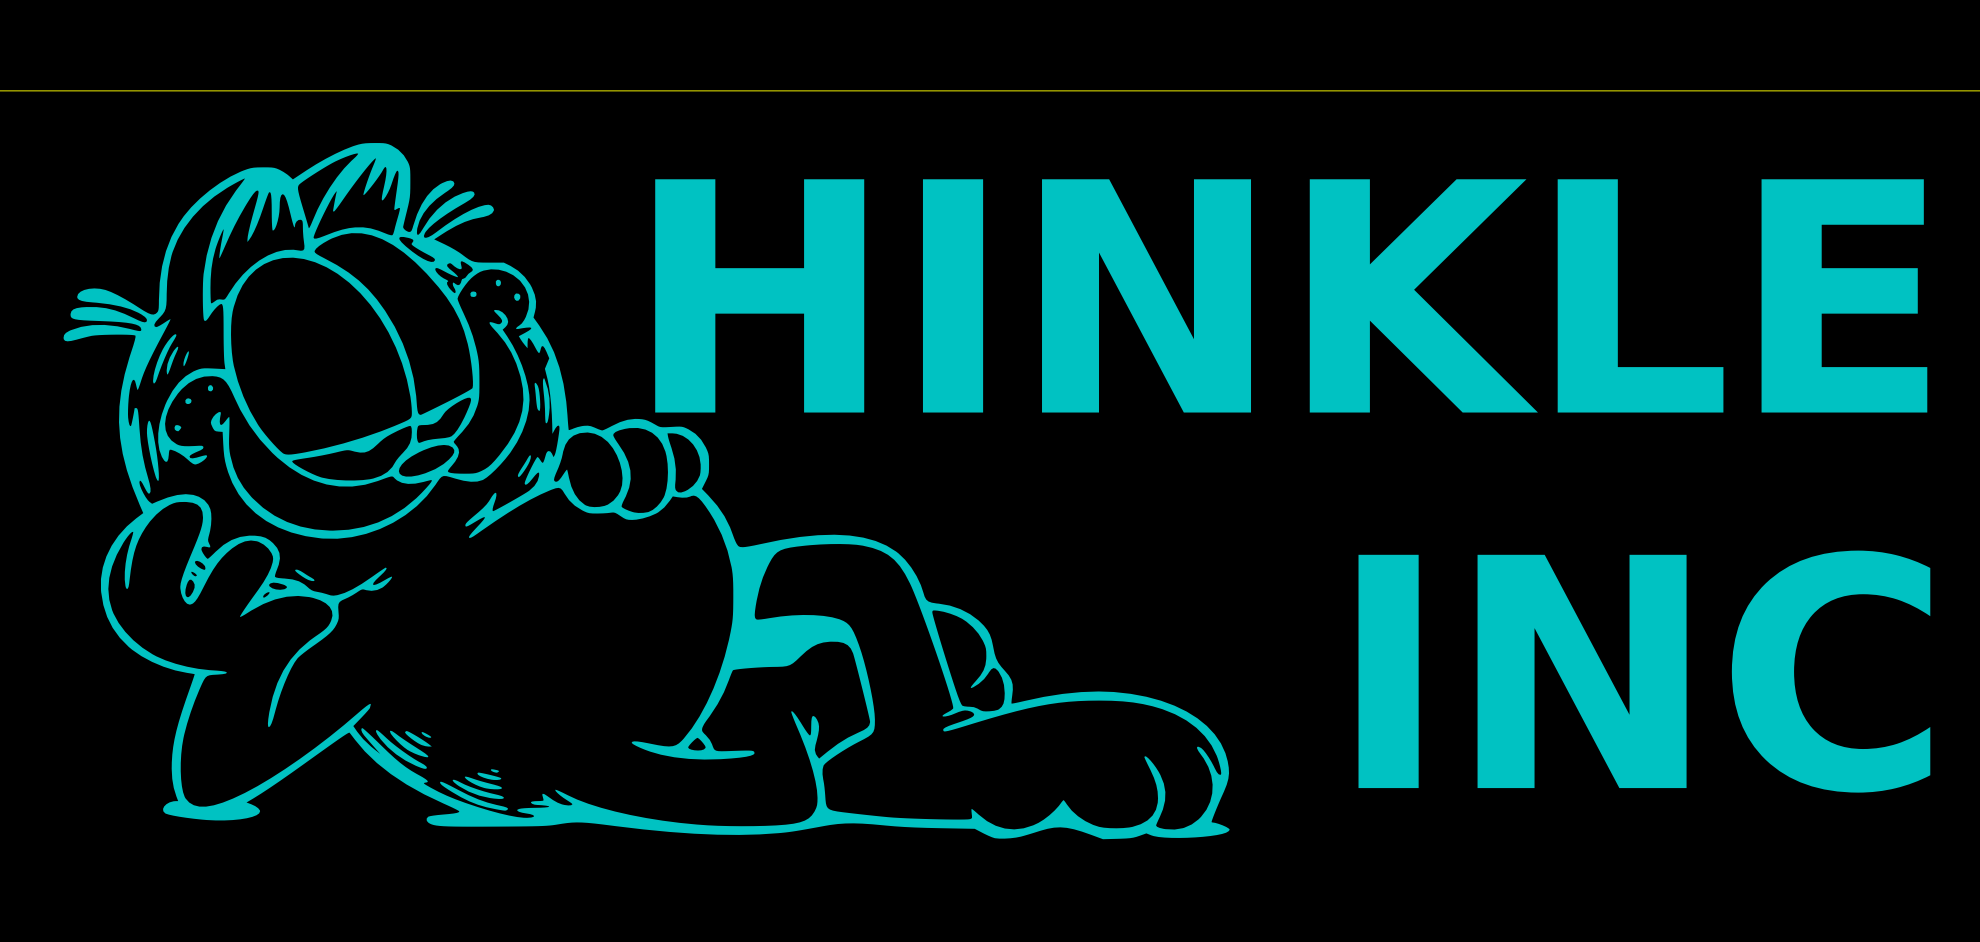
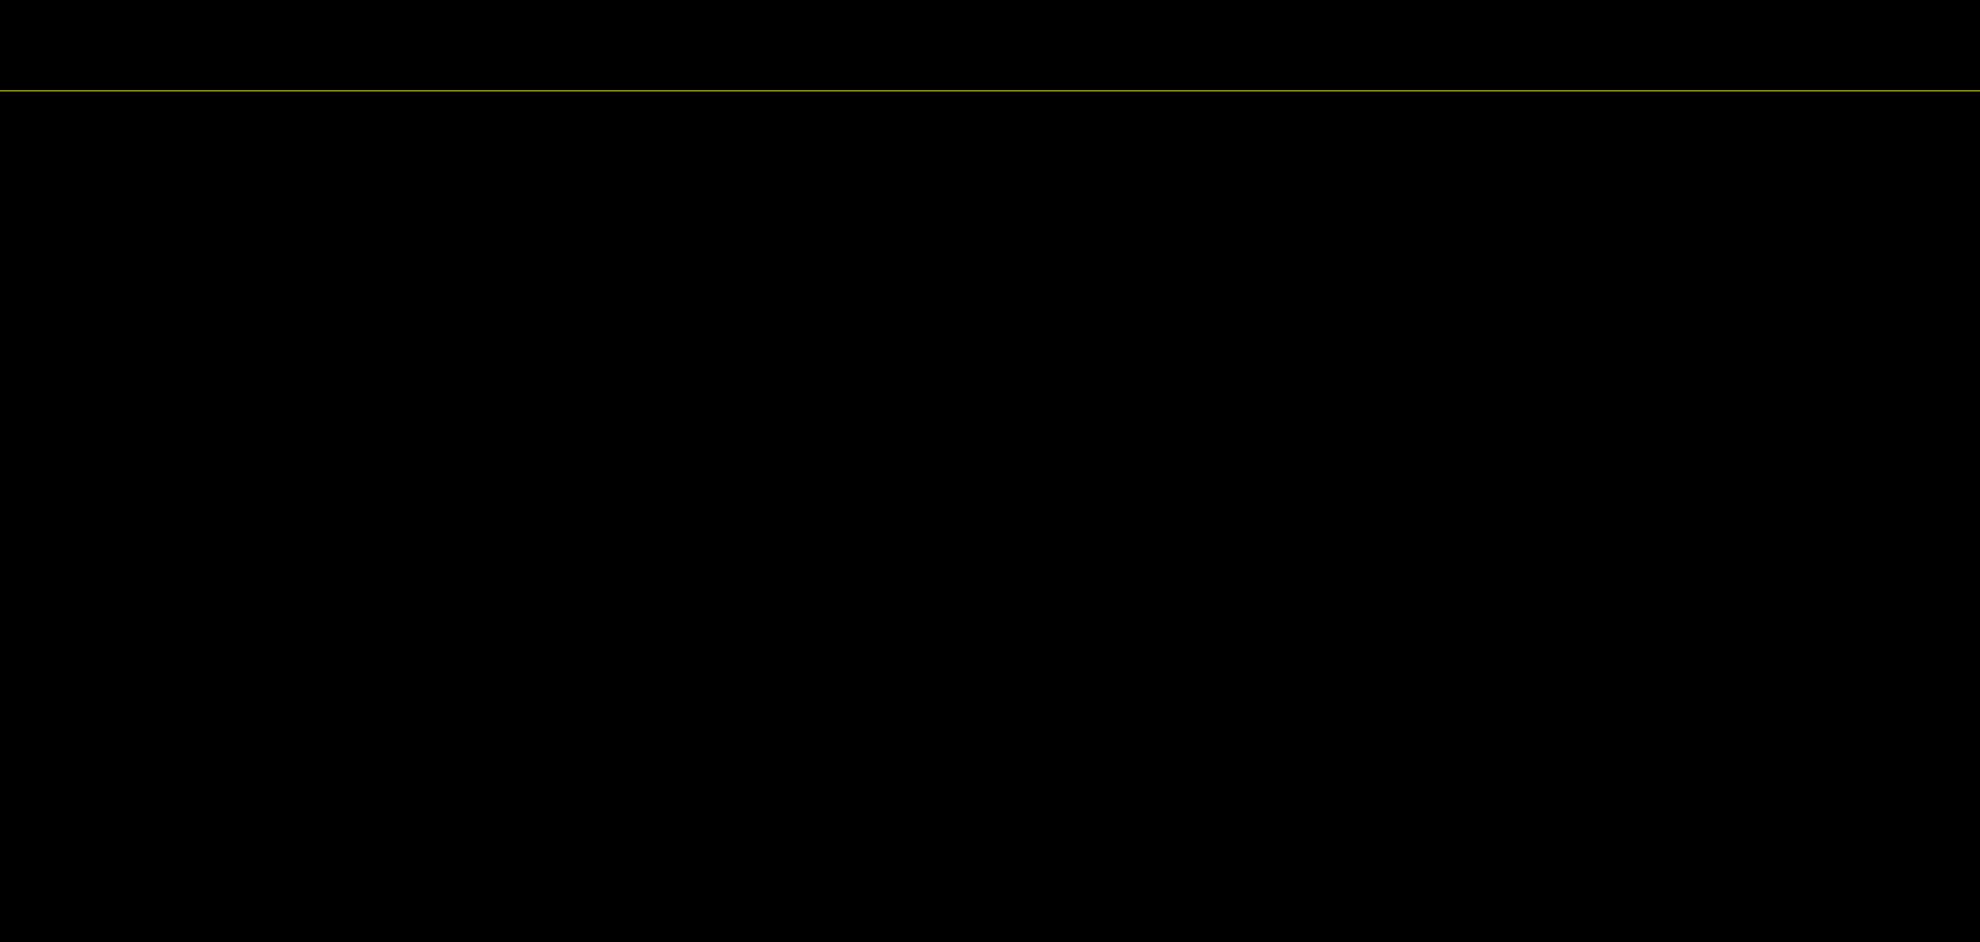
drawing: [63, 143, 1230, 840] -> none
text: HINKLE (1291, 295) -> none
text: INC (1644, 671) -> none

